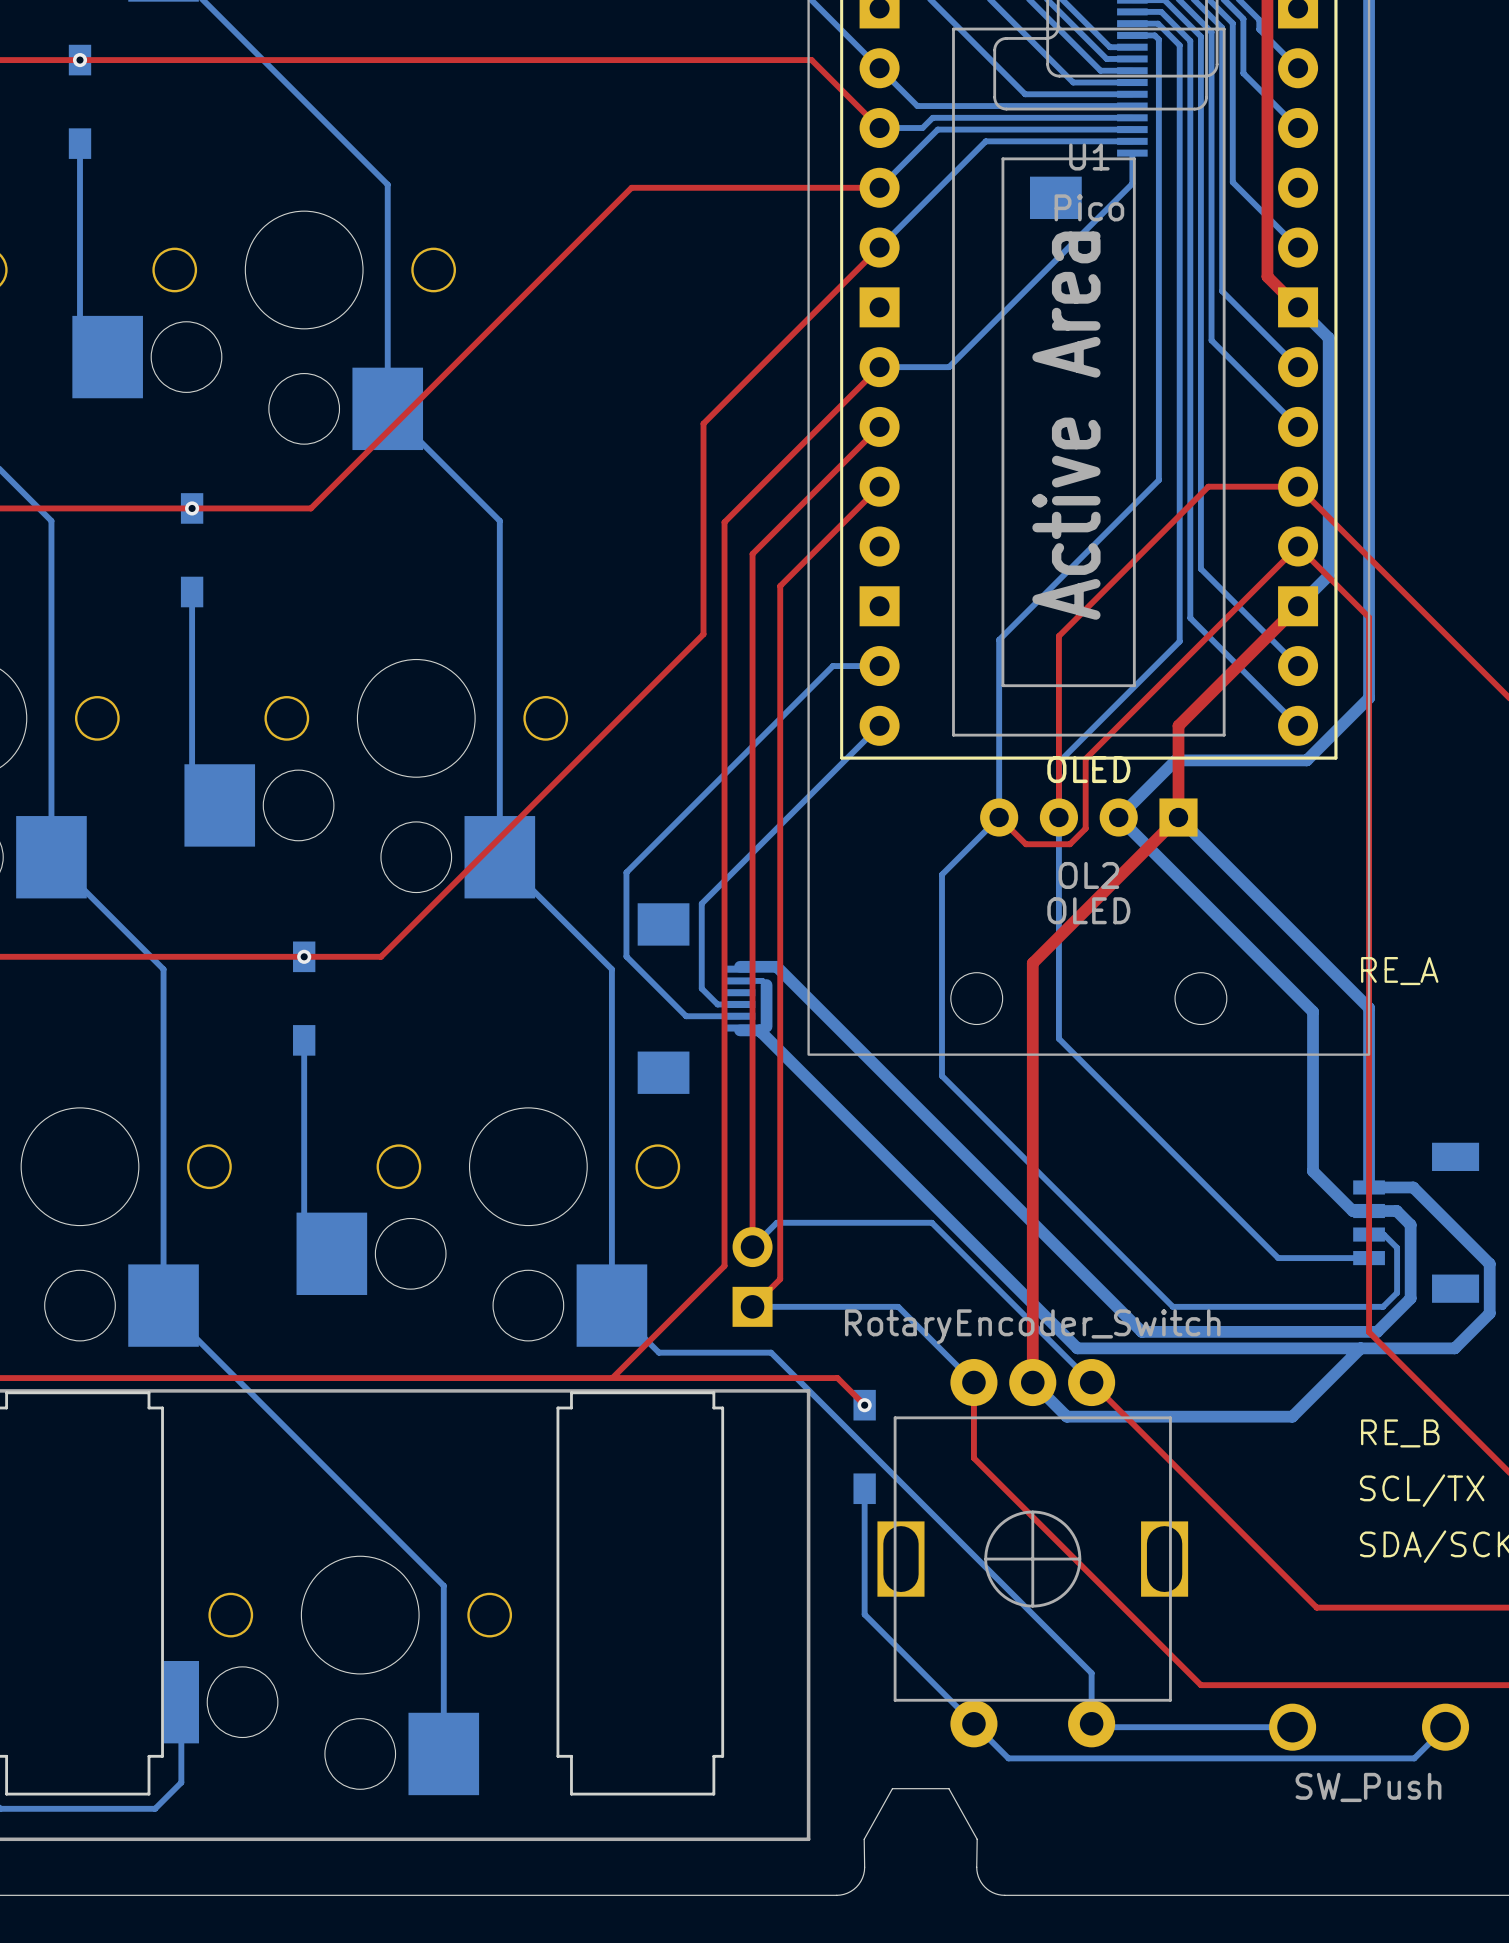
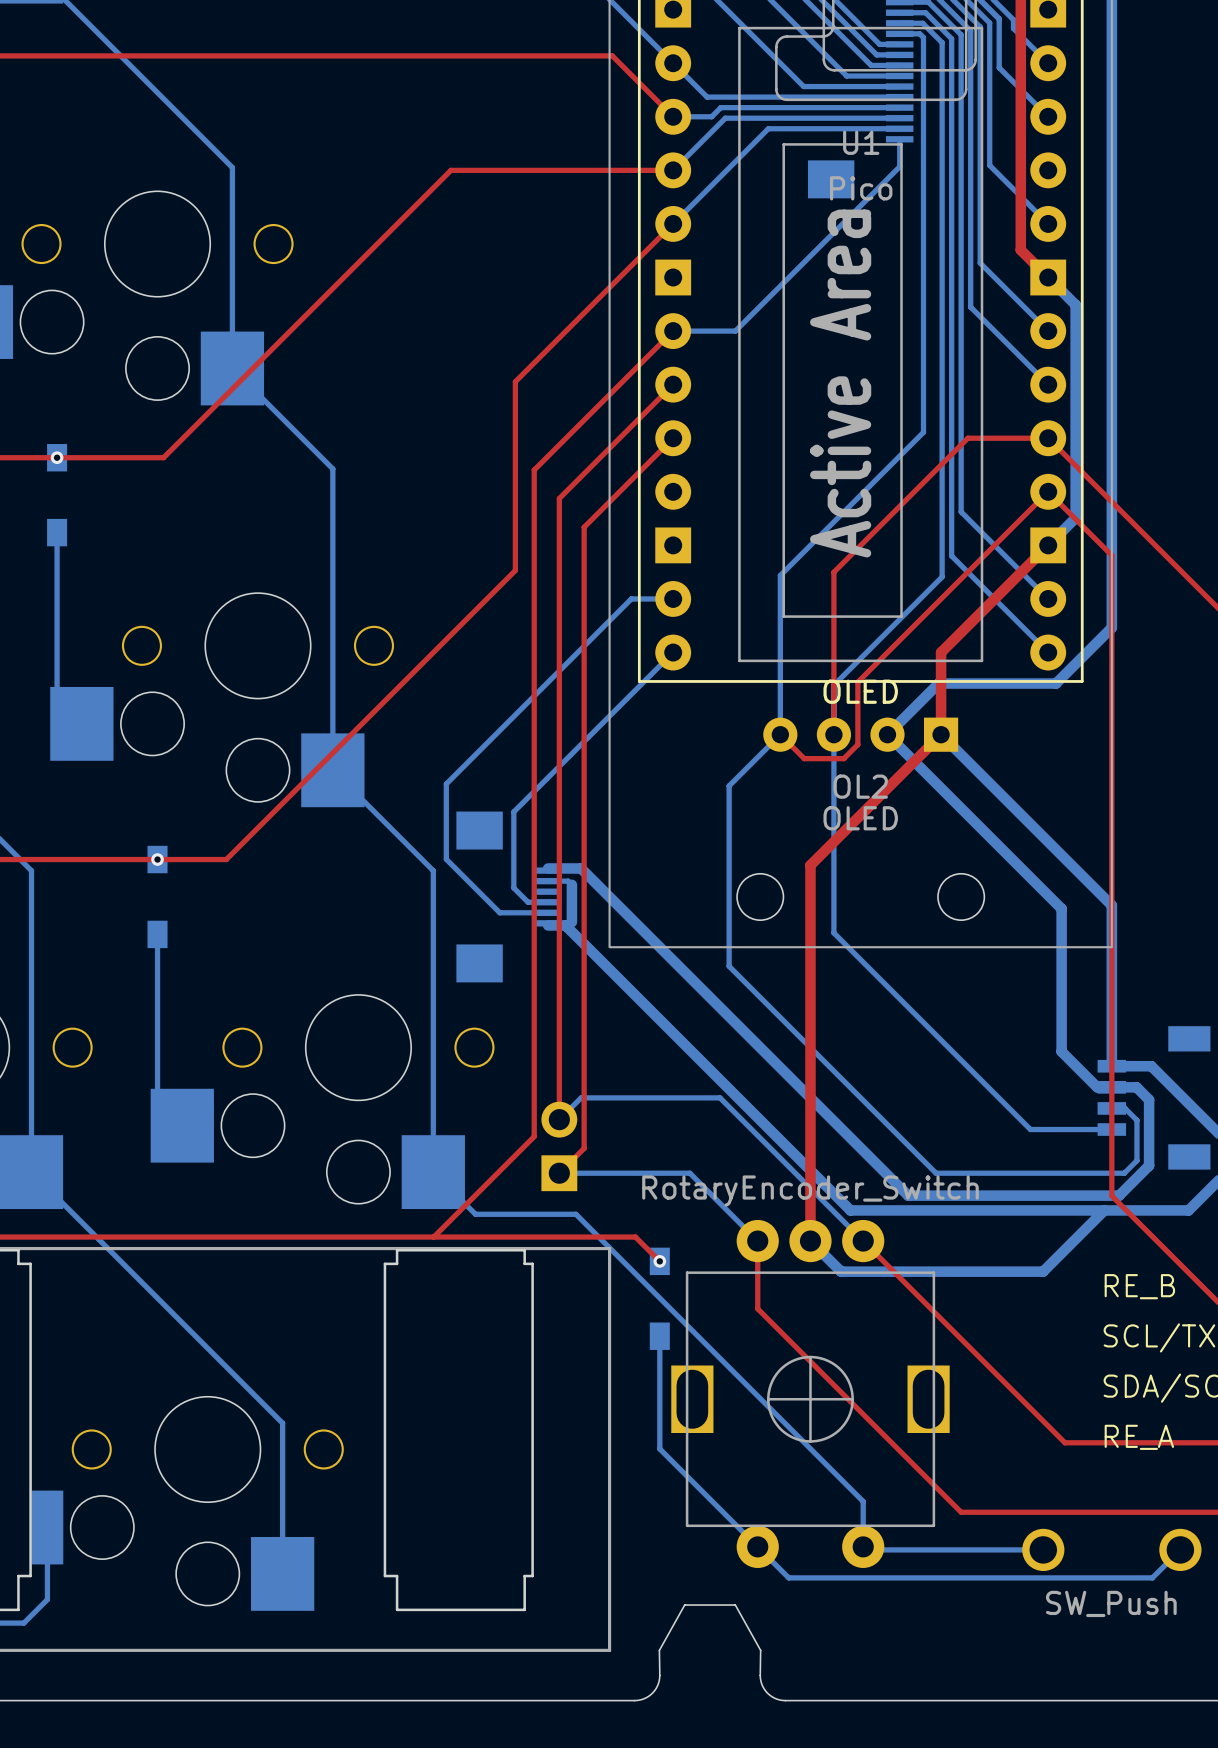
text: RE_A (1399, 971) -> none
text: none -> RE_A (1139, 1437)

